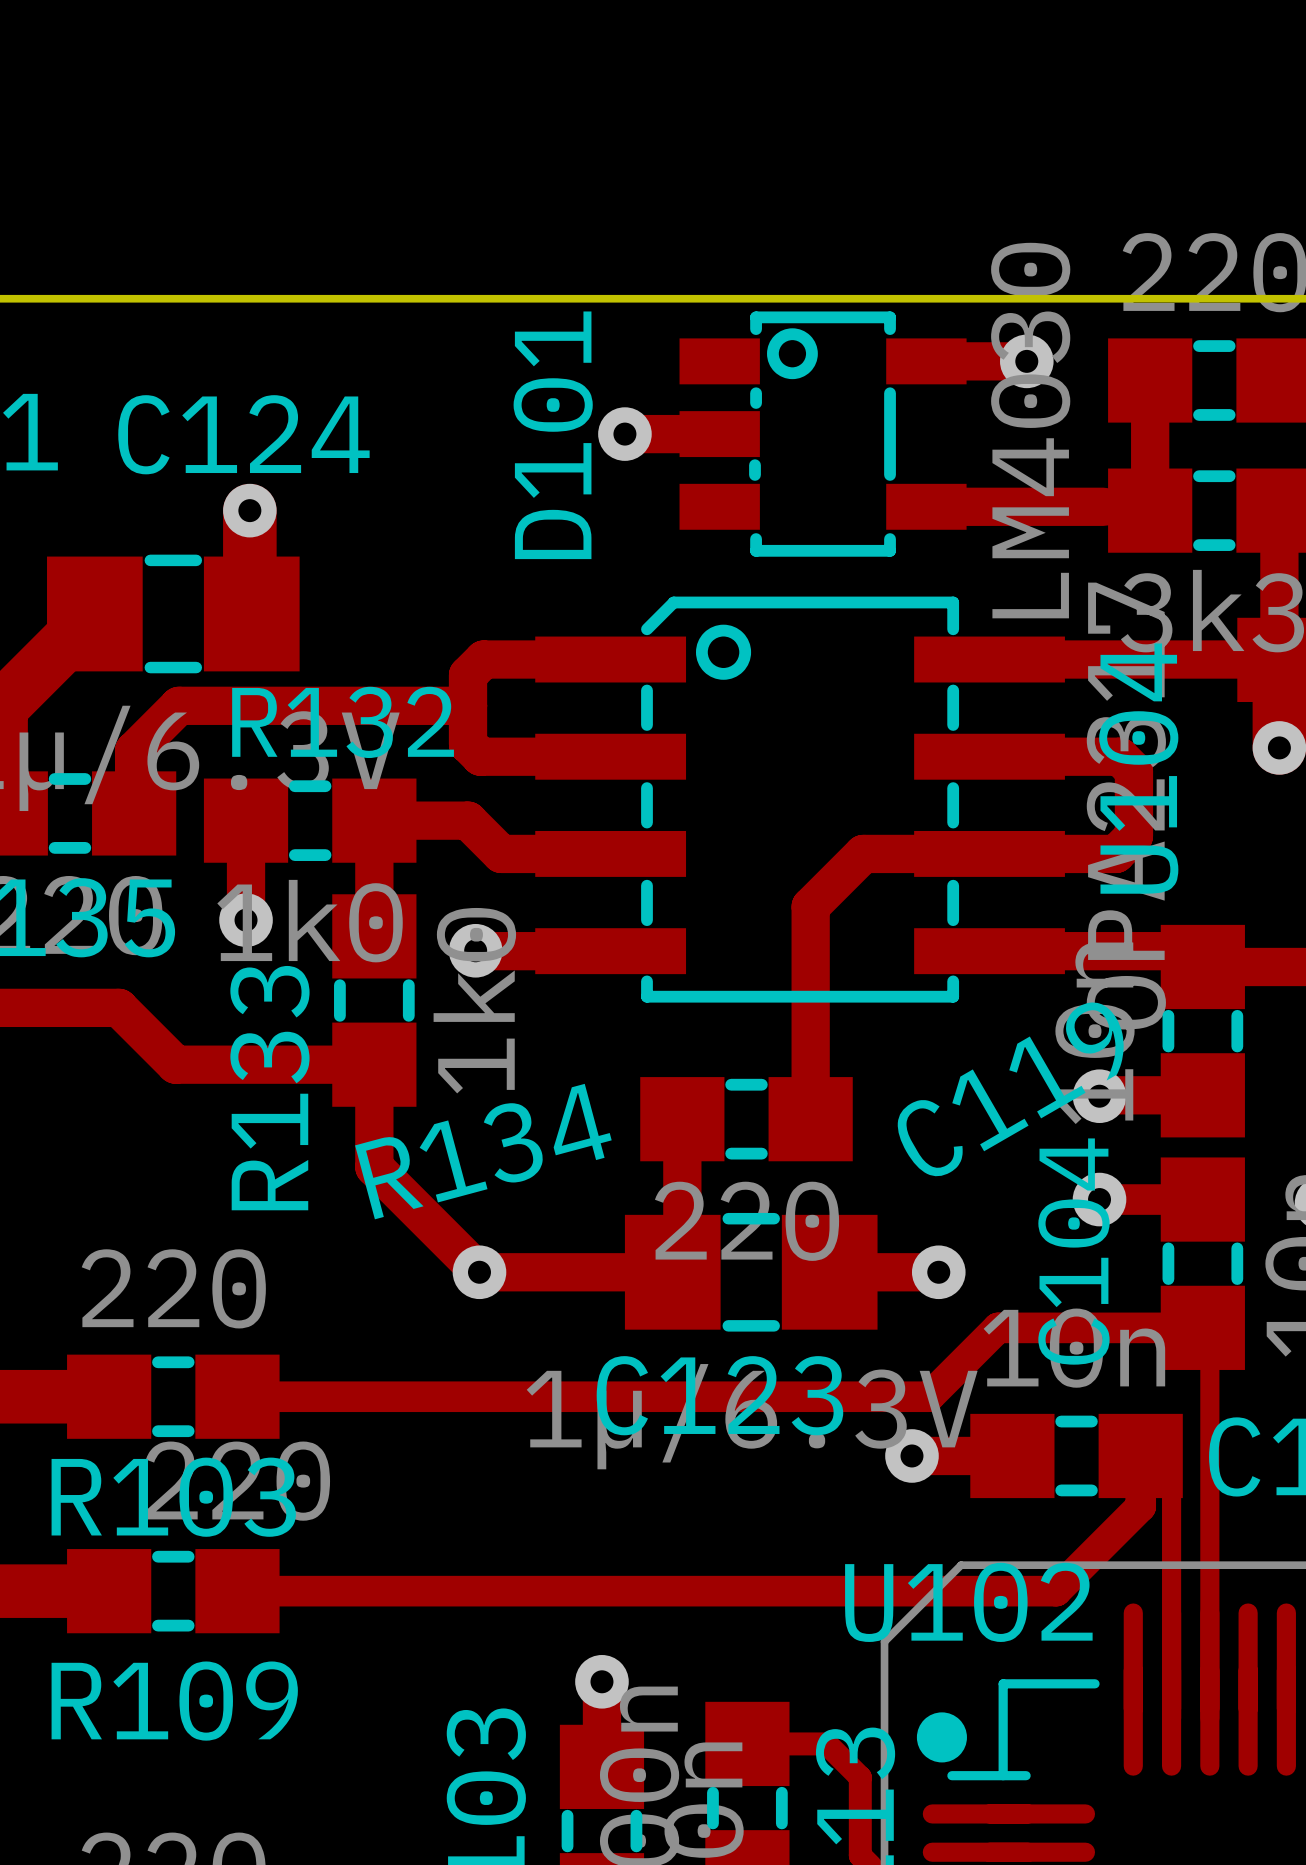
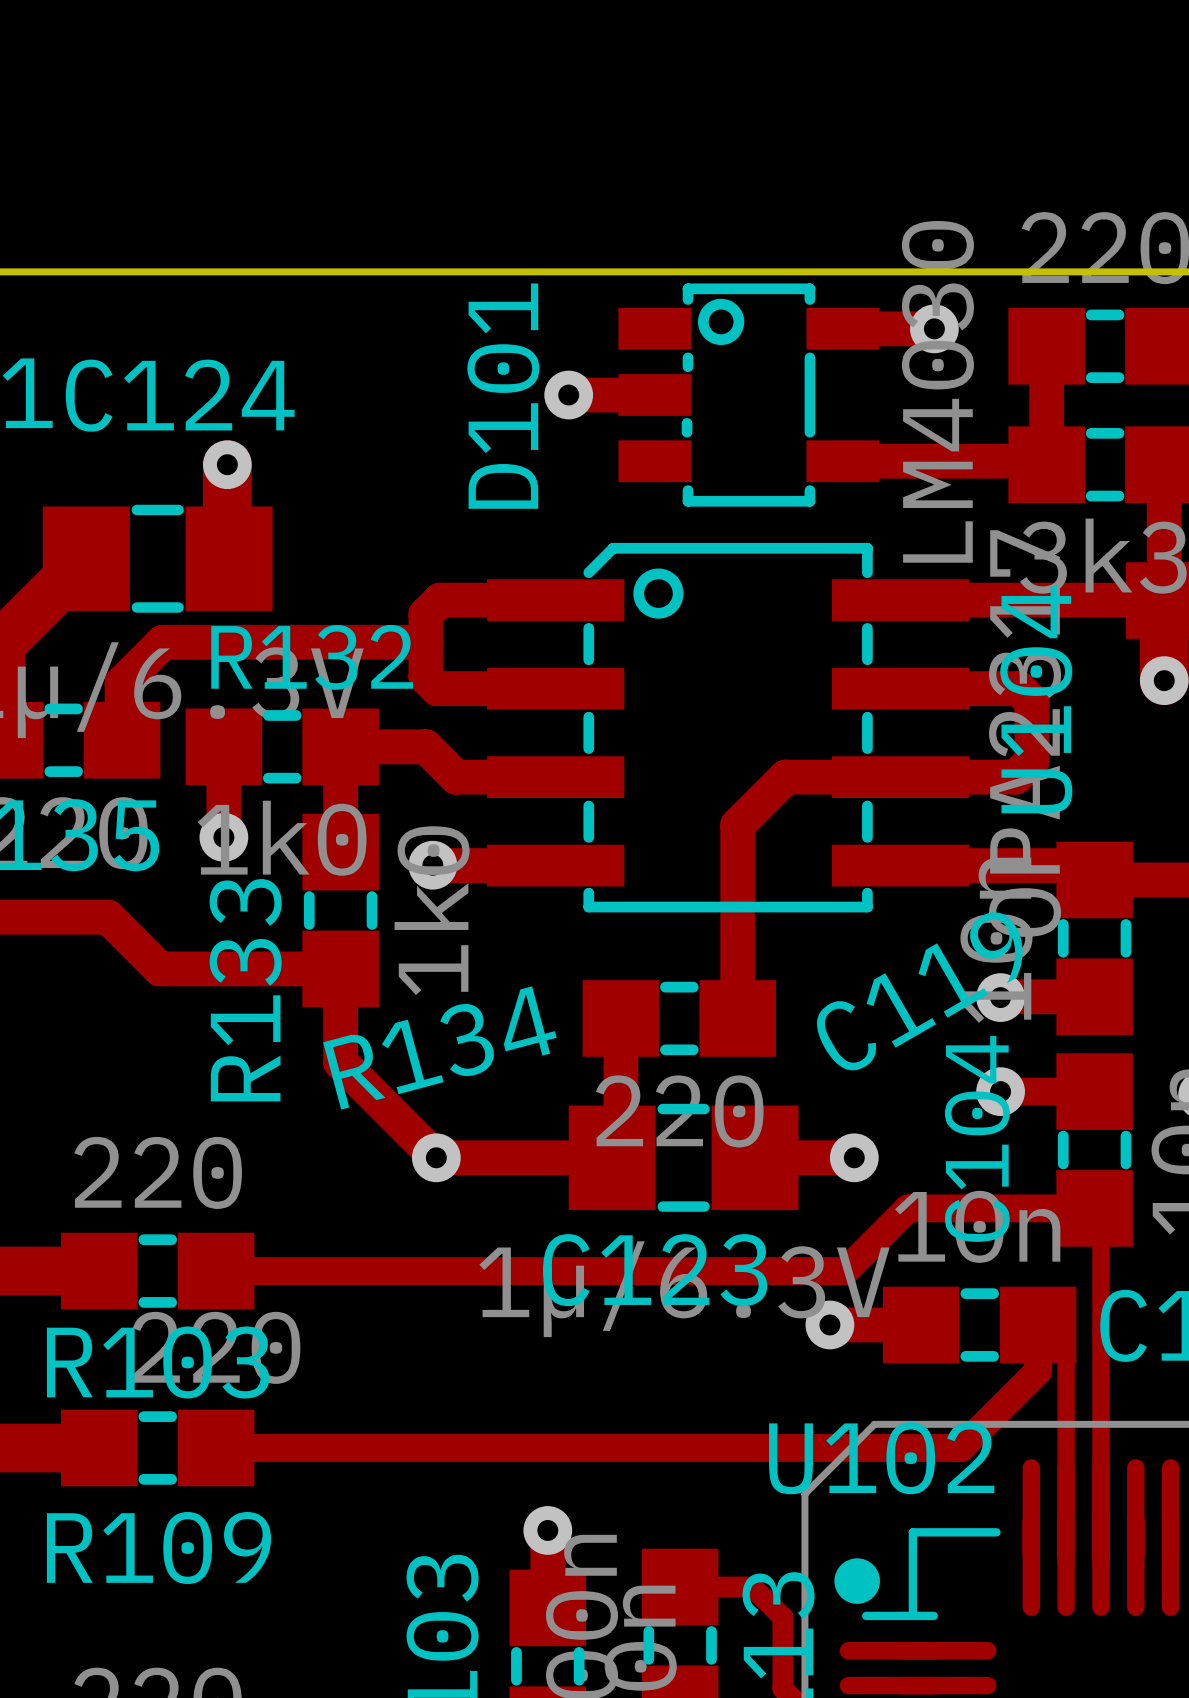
C124 name position: C124 (243, 434) -> C124 (180, 395)

